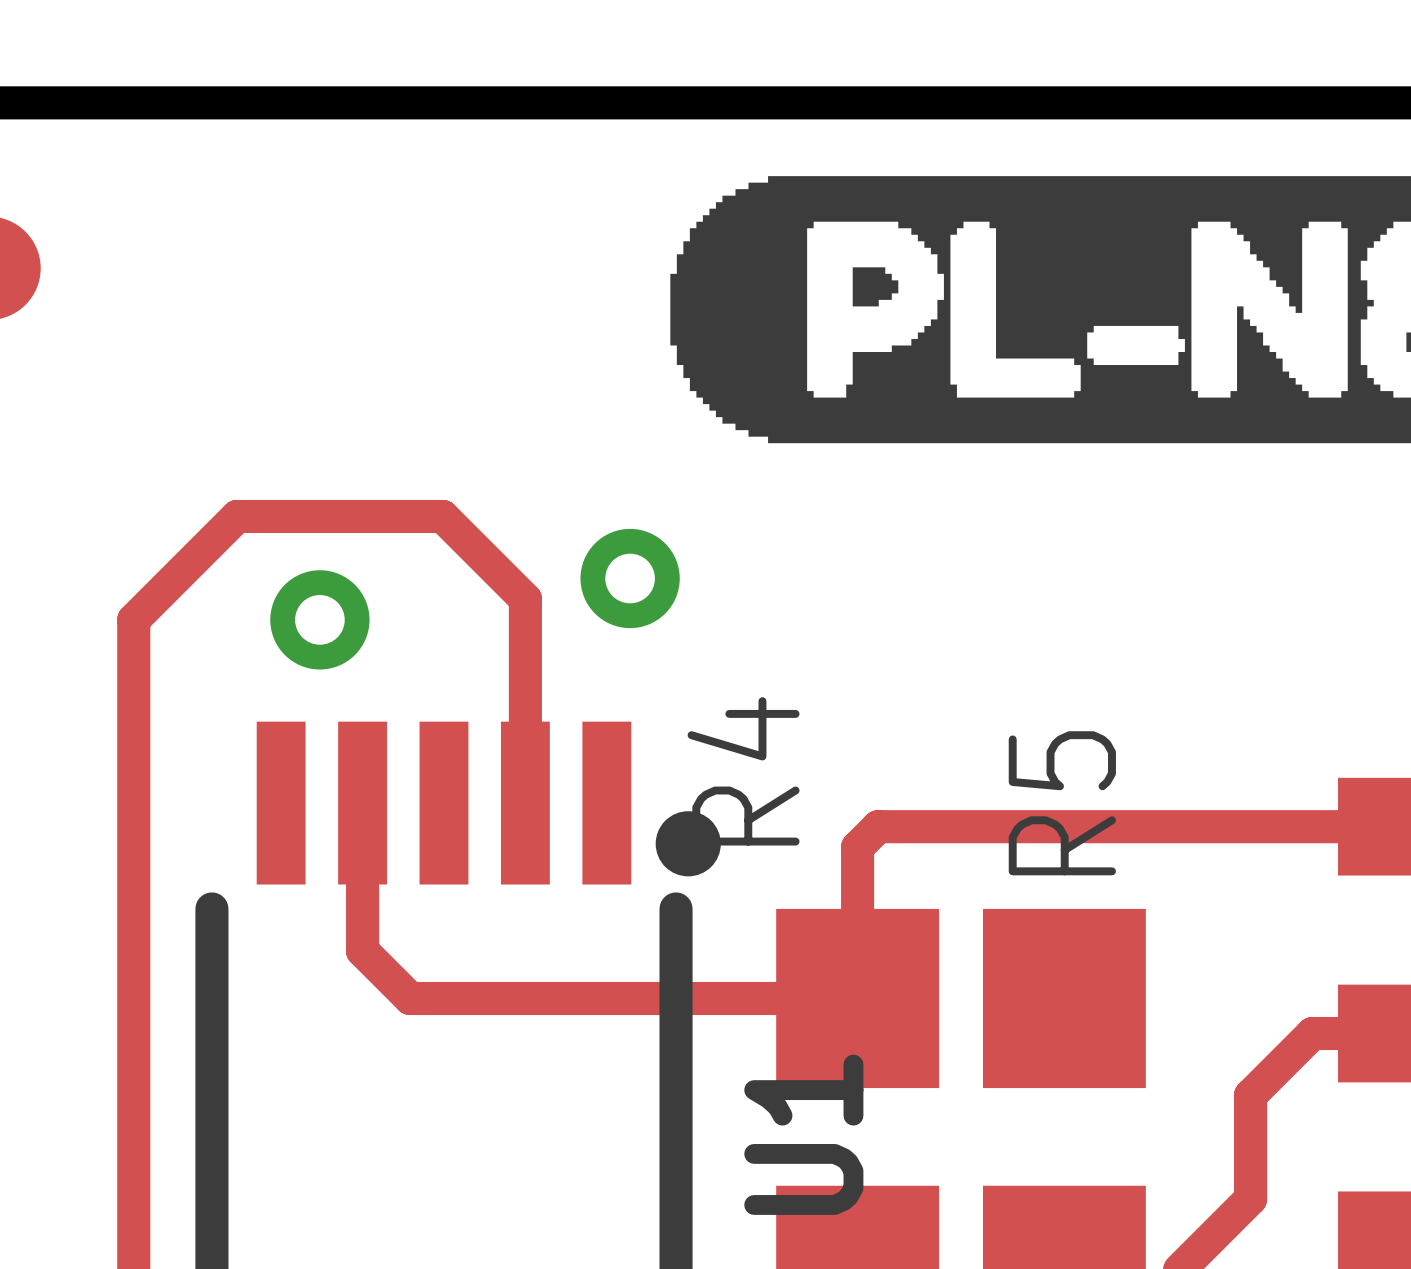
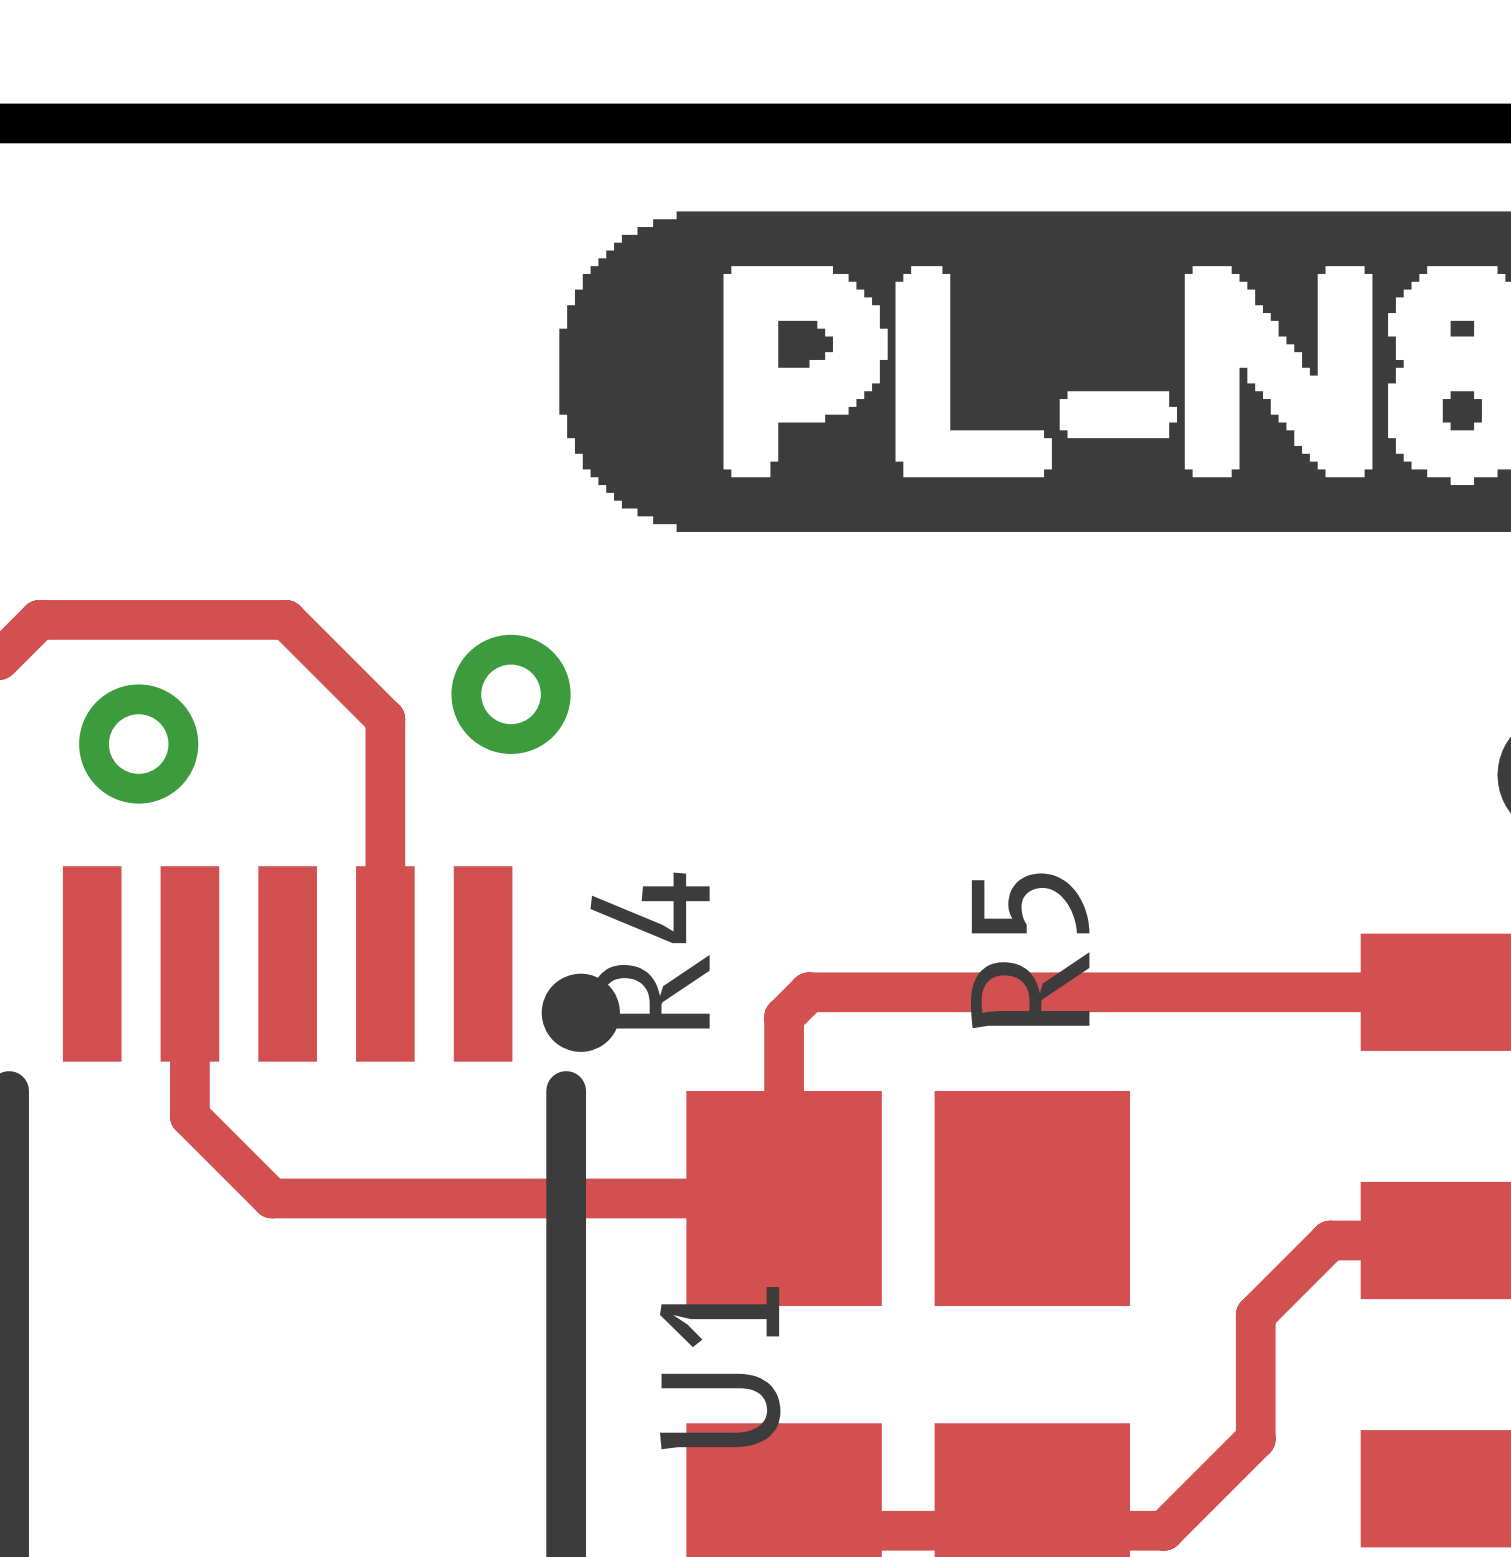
track: (362, 930) (362, 950) (410, 998) (430, 998) -> (189, 1116) (271, 1198)

